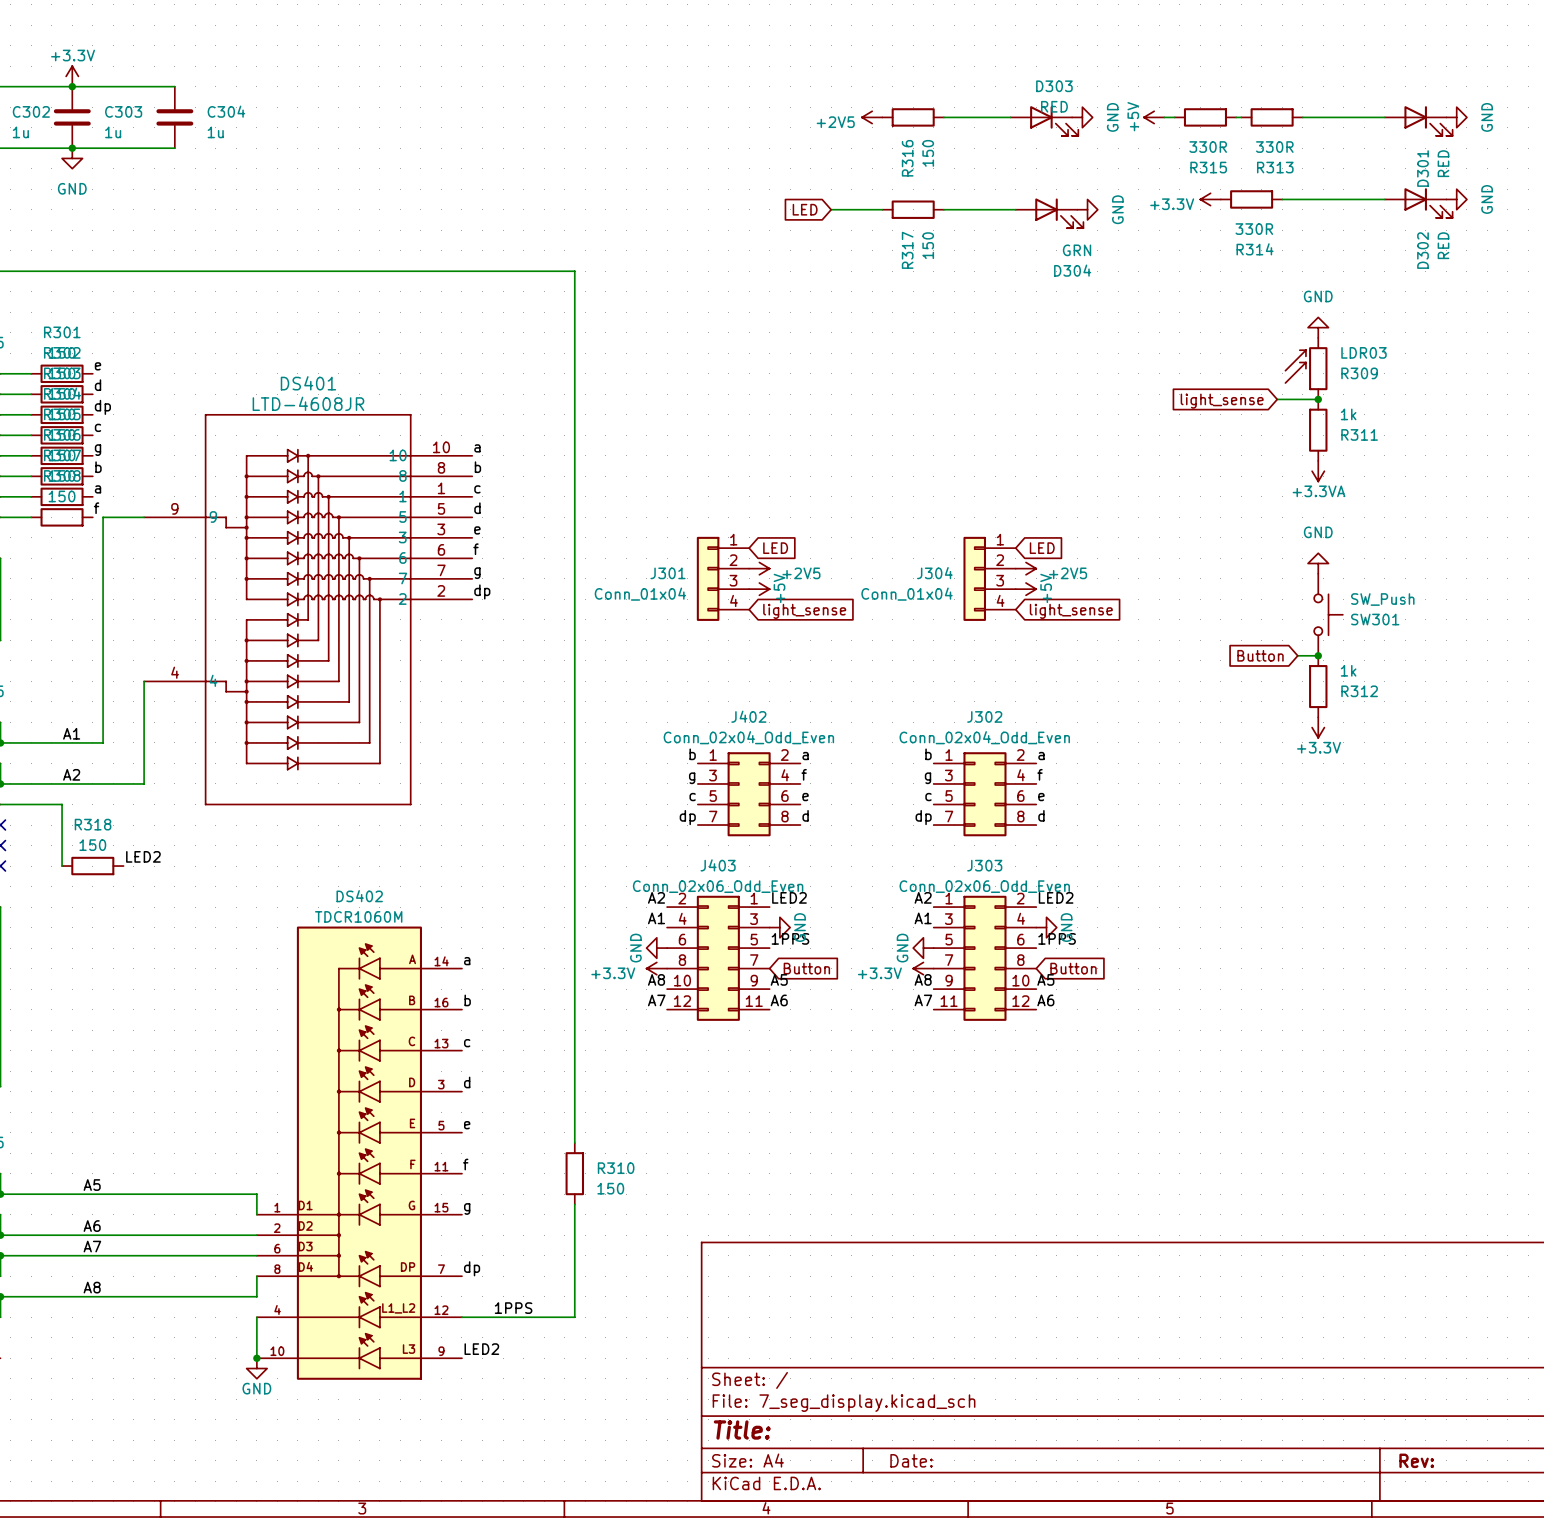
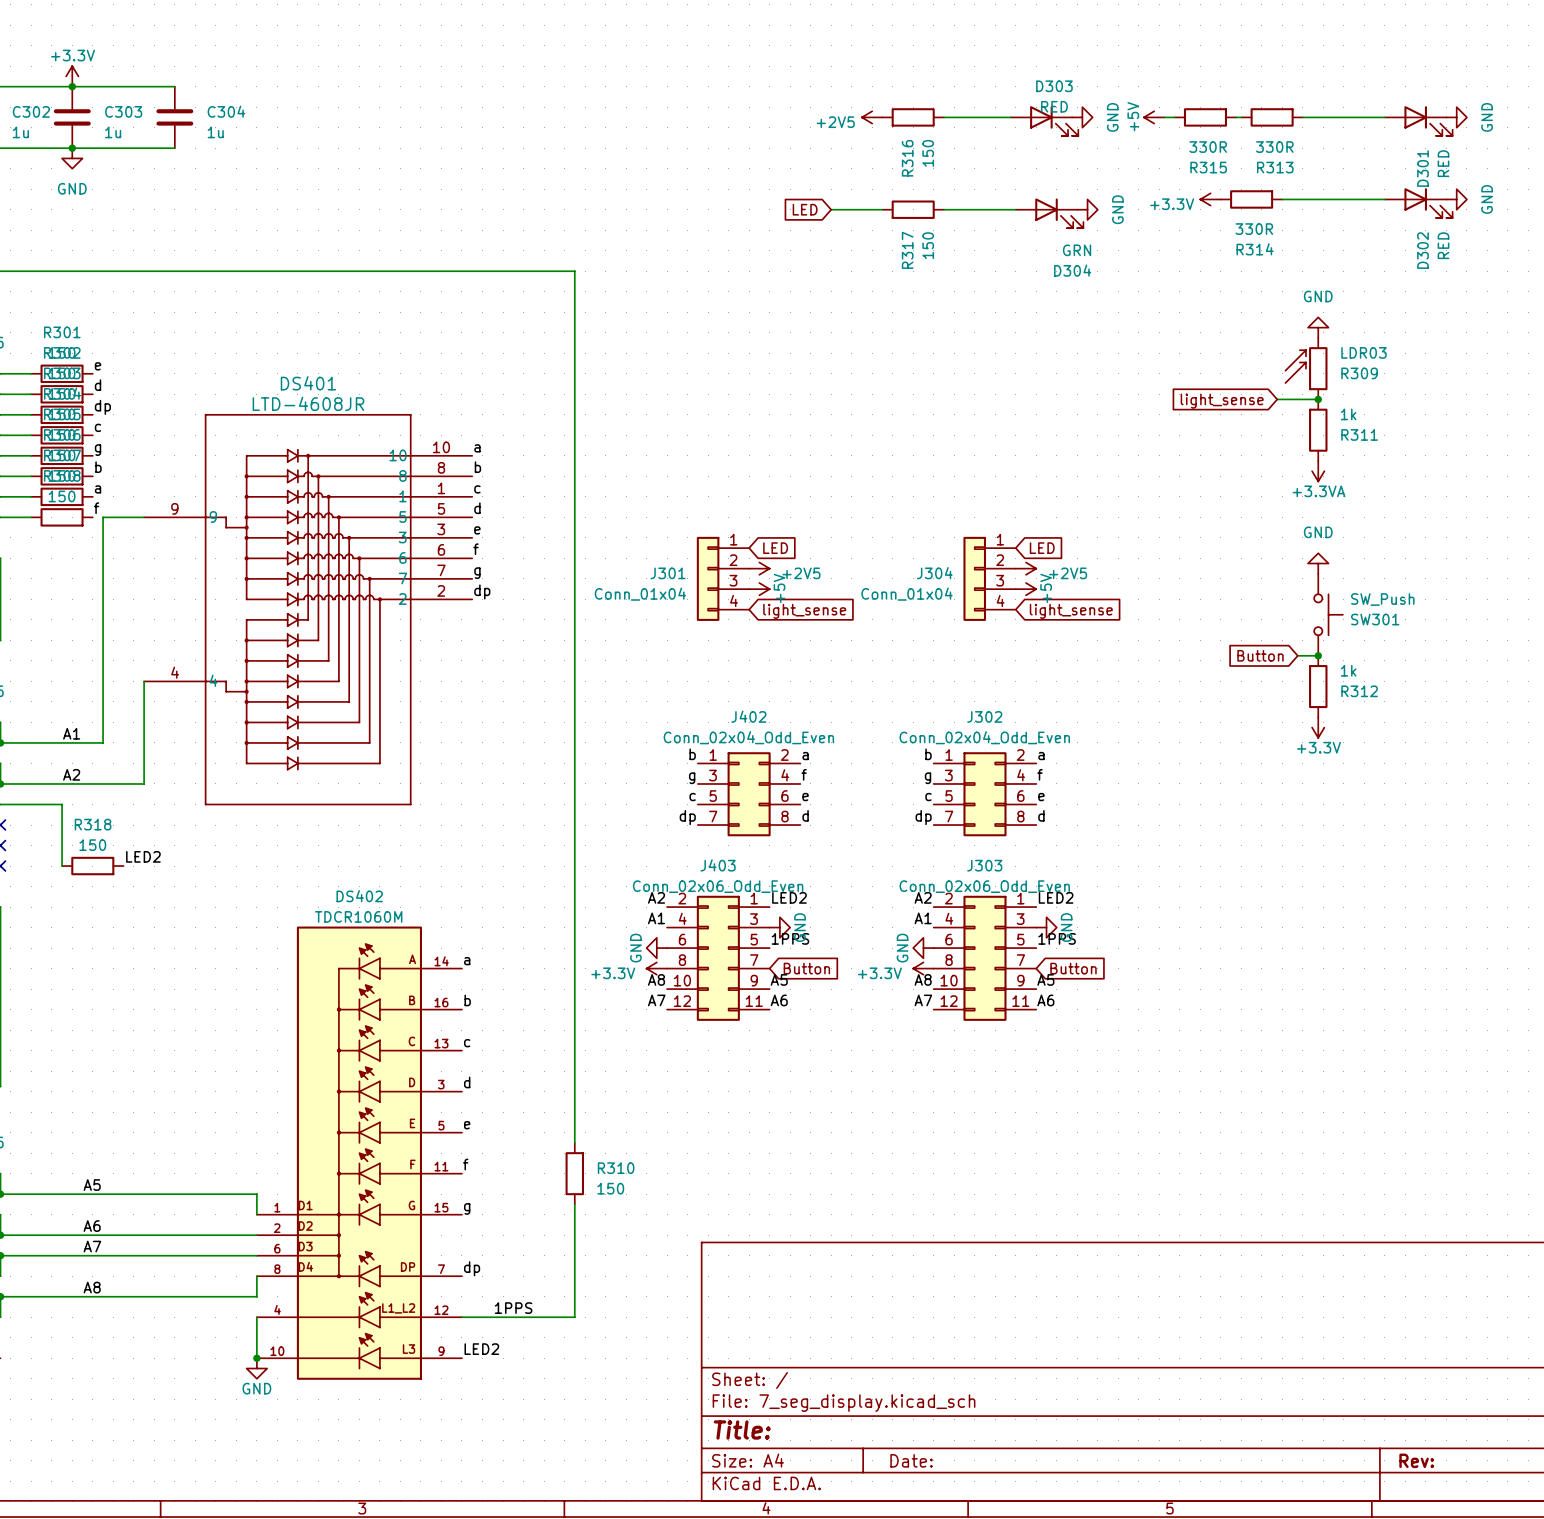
J303 flip: as is (984, 958) -> left-right (984, 958)

